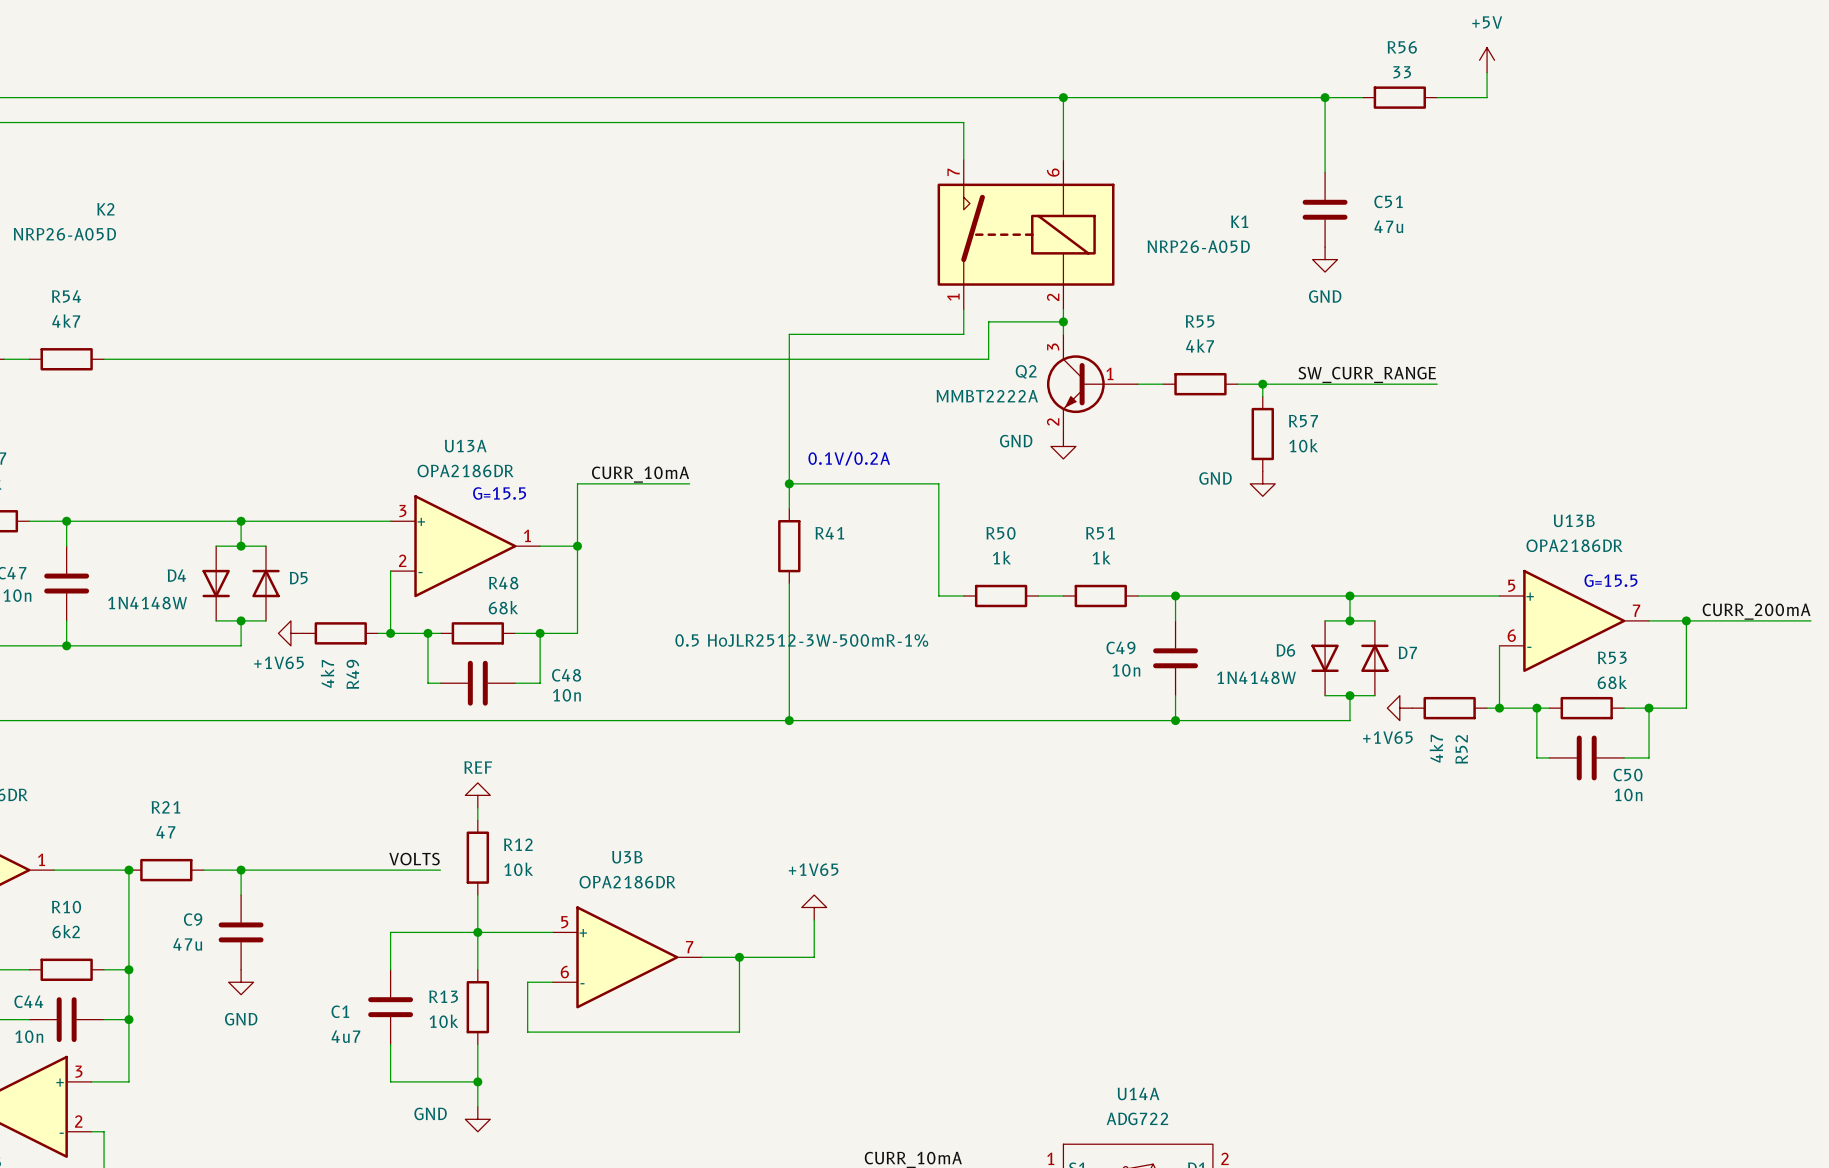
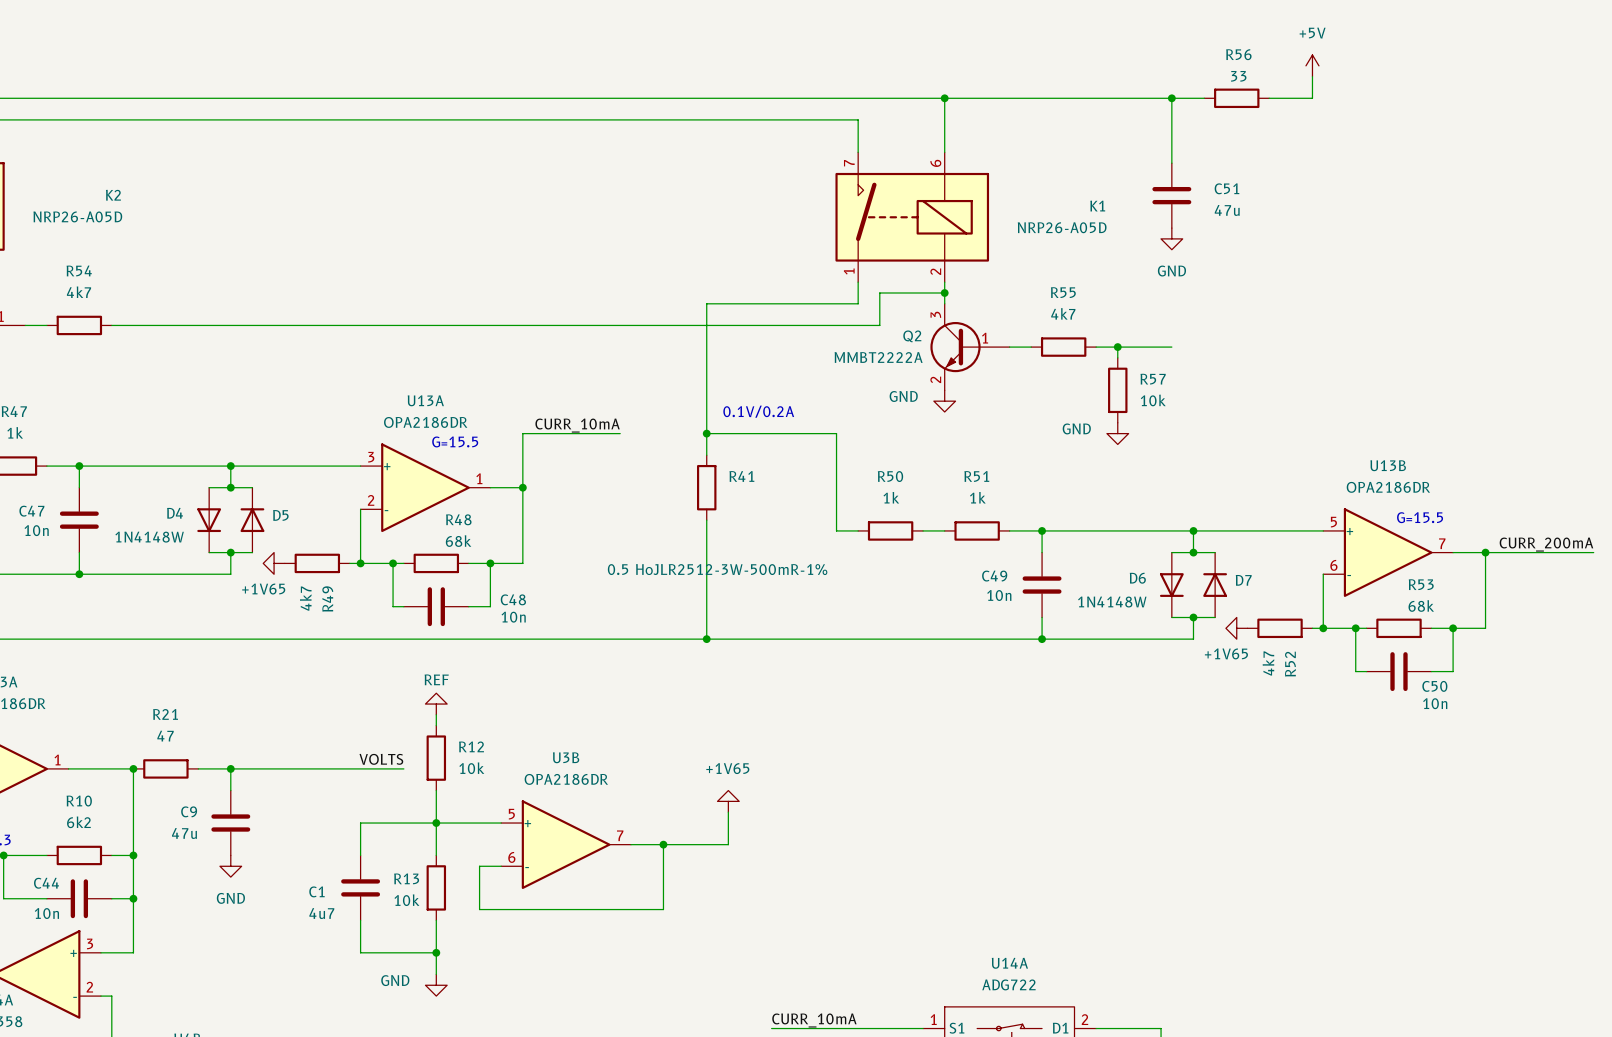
label: SW_CURR_RANGE (1367, 374) -> none
wire: (1325, 384) (1437, 384) -> none

